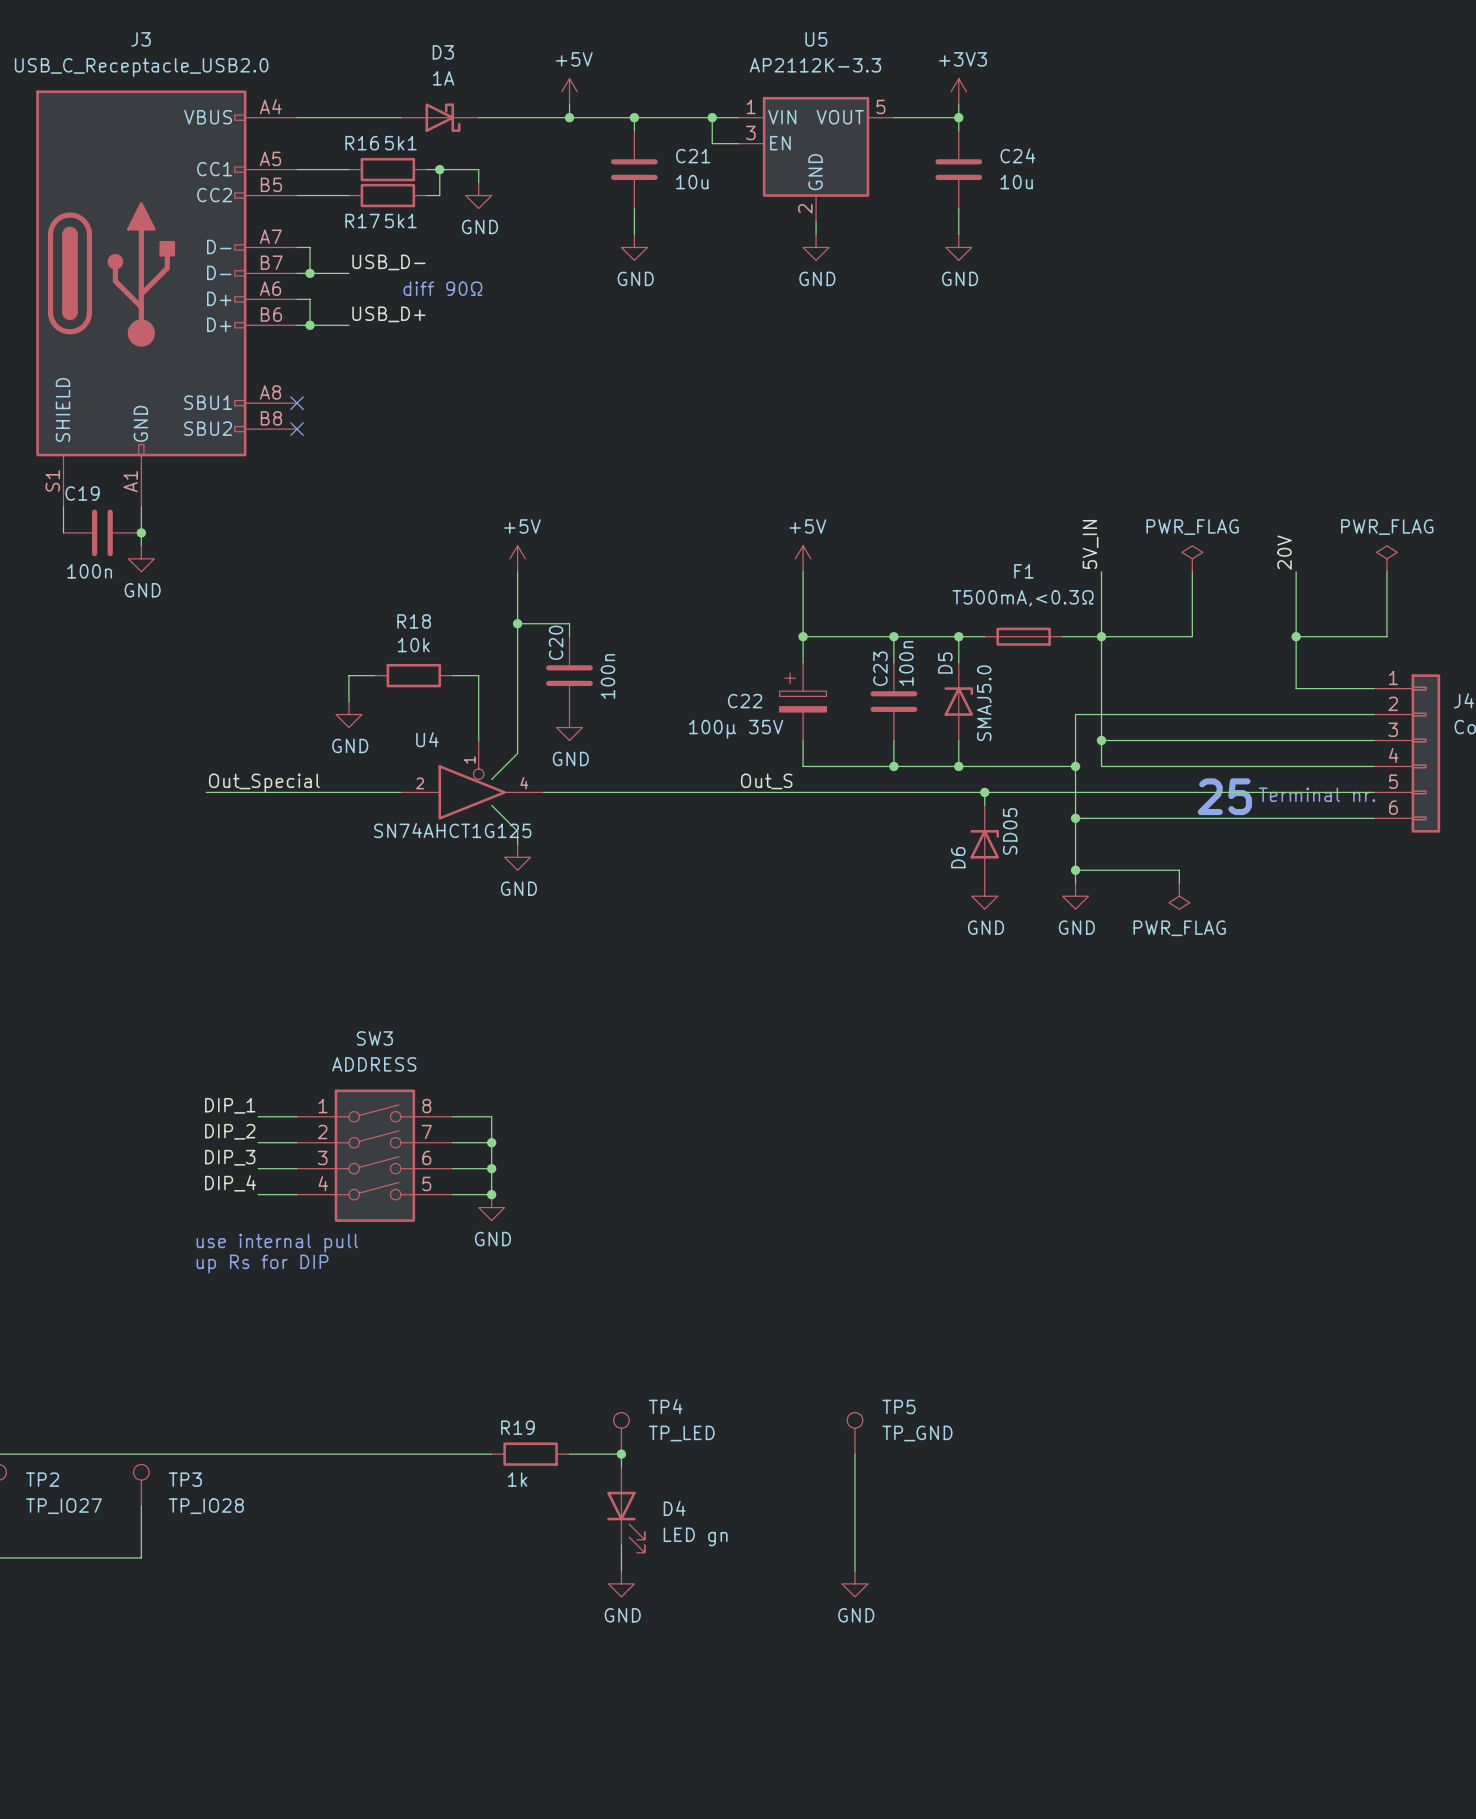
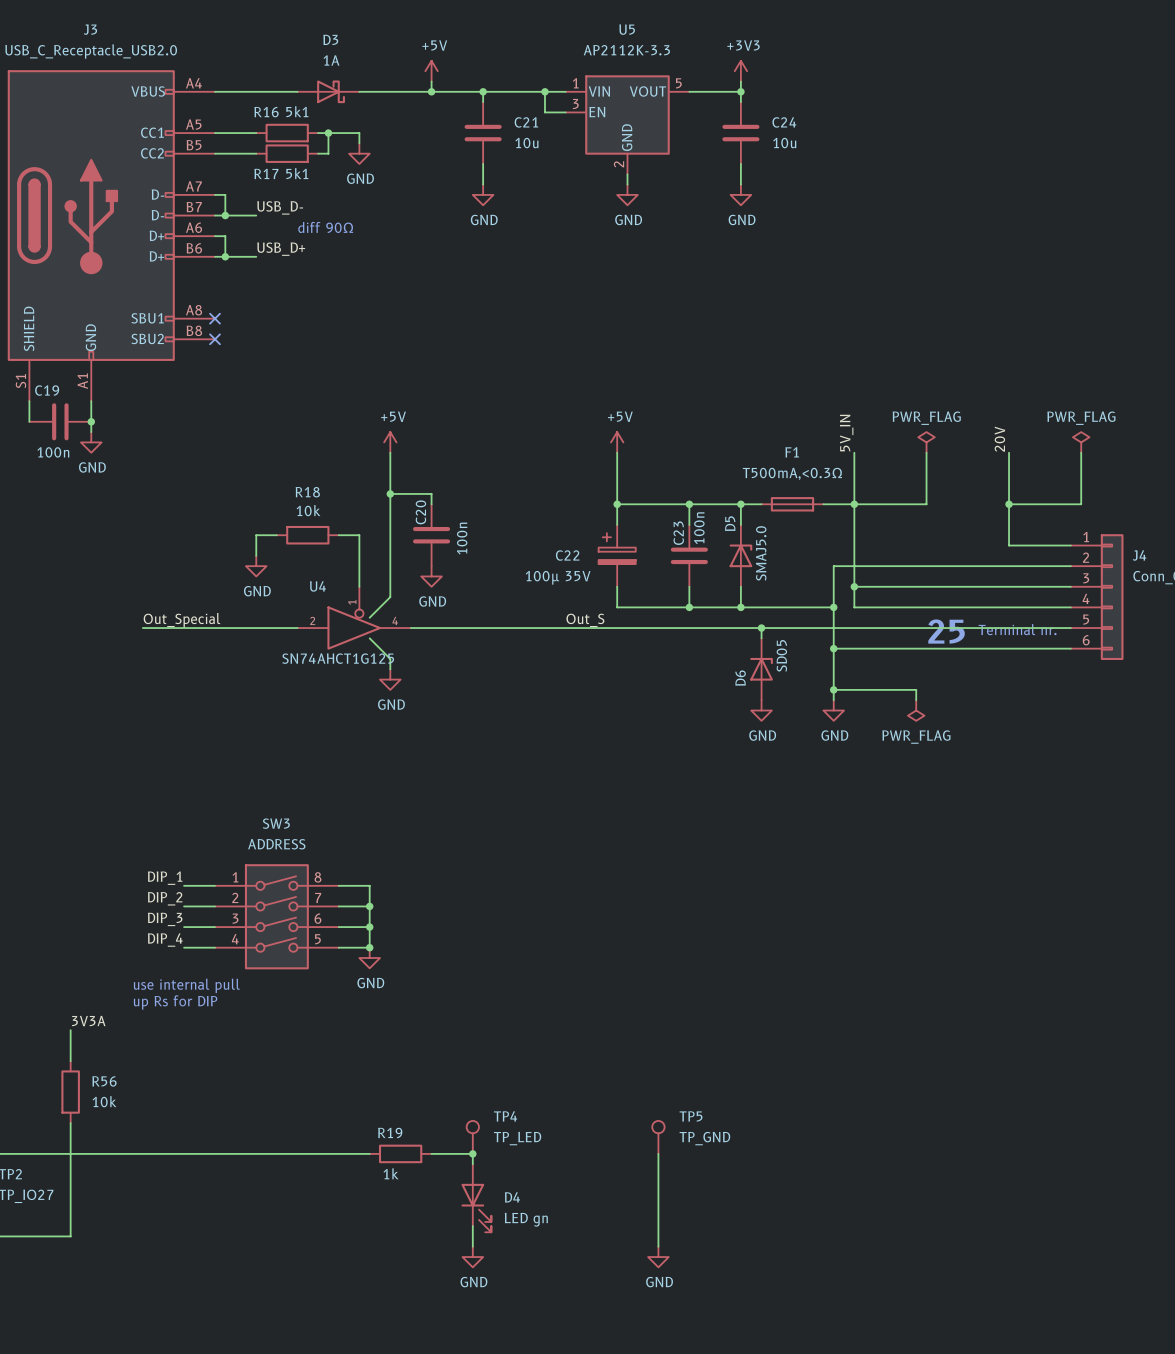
label: none -> 3V3A (88, 1021)
wire: none -> (70, 1030) (70, 1061)
R56: none -> 10k (70, 1092)
TP3: TP_IO28 (141, 1485) -> none
wire: (141, 1506) (141, 1557) (115, 1557) -> (70, 1122) (70, 1236)

